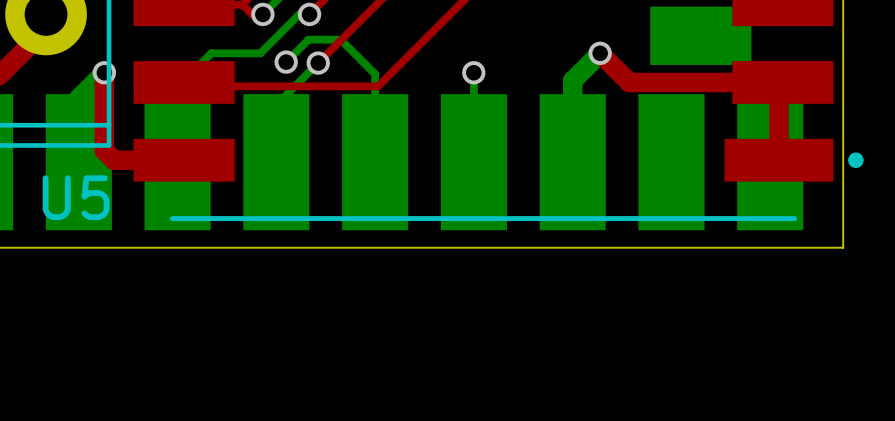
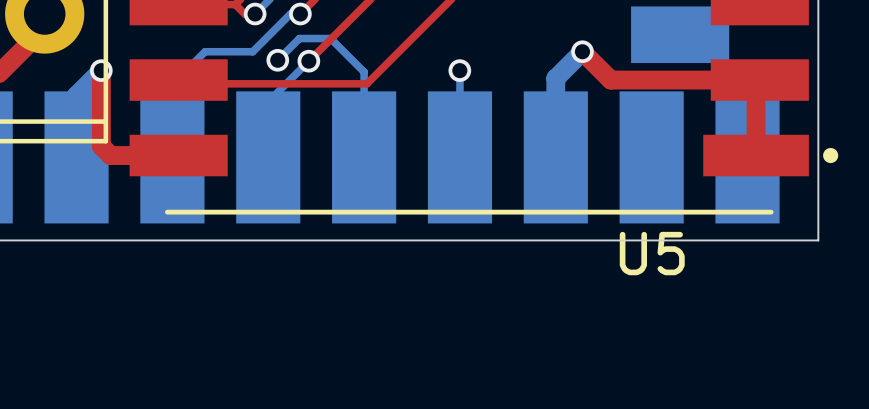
U5 name position: U5 (76, 197) -> U5 (652, 253)

